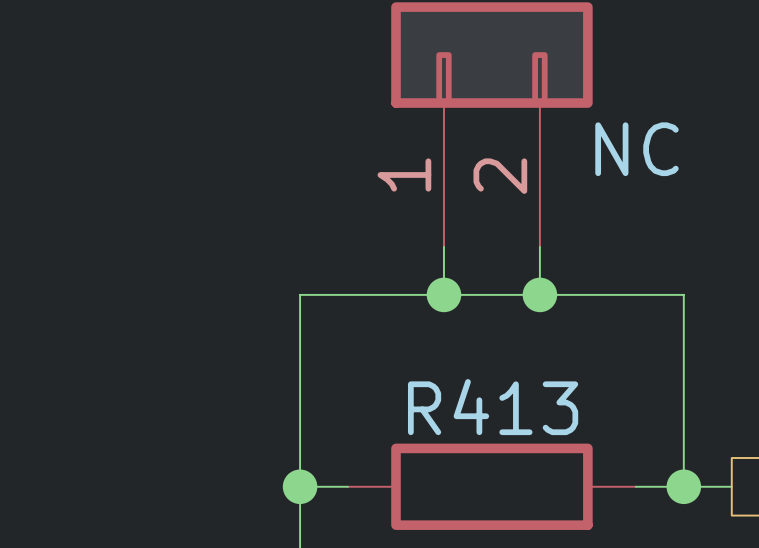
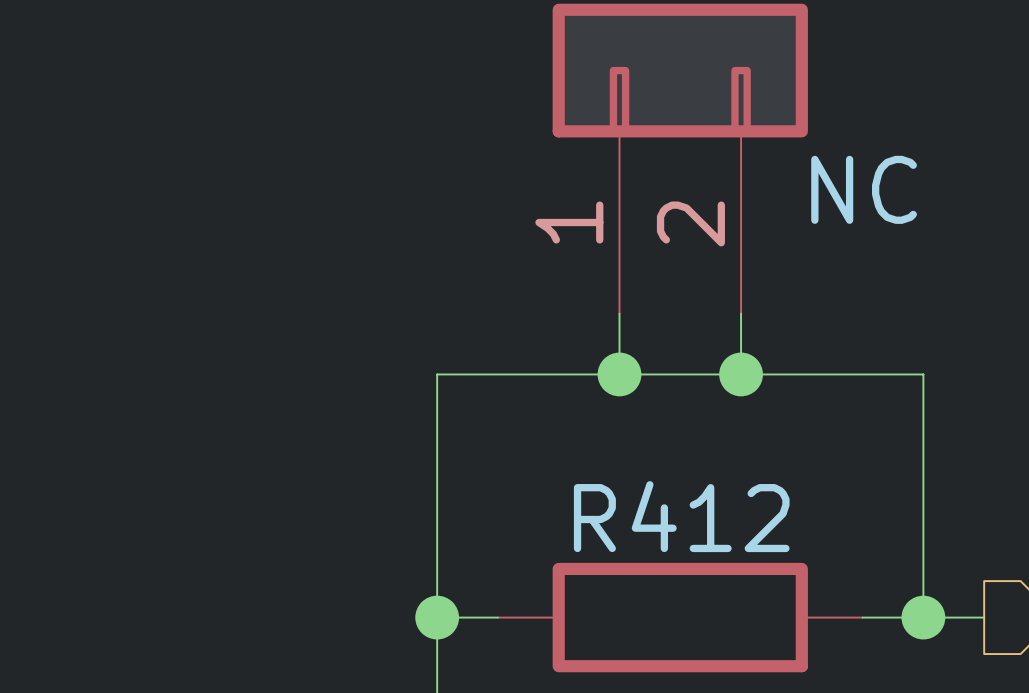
R413 name: R413 (493, 407) -> R412 (681, 516)

